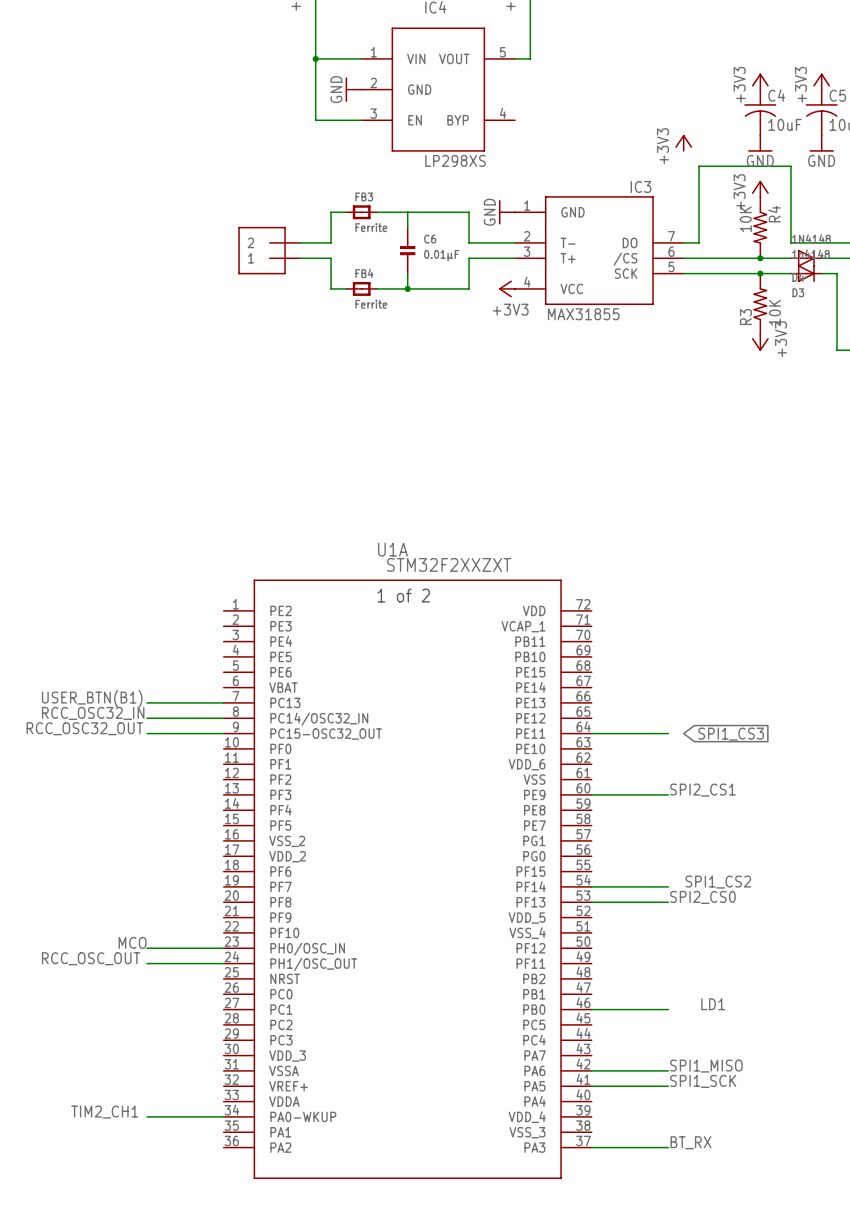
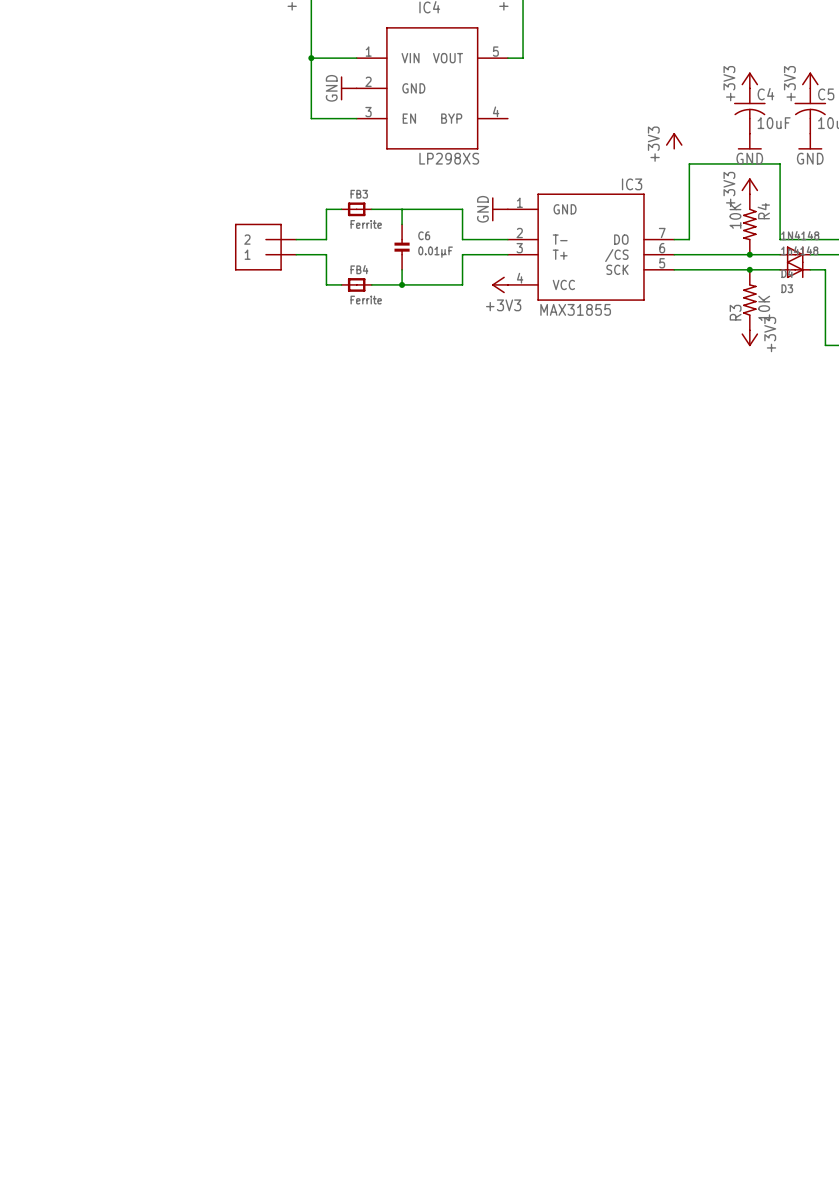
label: USER_BTN(B1) (92, 698) -> none
wire: (147, 702) (223, 702) -> none
label: RCC_OSC32_IN (93, 713) -> none
wire: (147, 718) (223, 718) -> none
label: RCC_OSC32_OUT (84, 728) -> none
wire: (147, 733) (223, 733) -> none
wire: (591, 733) (668, 733) -> none
global label: SPI1_CS3 (731, 734) -> none
label: SPI2_CS1 (702, 790) -> none
wire: (591, 794) (668, 794) -> none
U1A: STM32F2XXZXT (407, 879) -> none
label: SPI1_CS2 (718, 882) -> none
wire: (591, 886) (668, 886) -> none
label: SPI2_CS0 (702, 897) -> none
wire: (591, 902) (668, 902) -> none
label: MCO (132, 942) -> none
wire: (147, 948) (223, 948) -> none
label: RCC_OSC_OUT (91, 958) -> none
wire: (147, 963) (223, 963) -> none
label: LD1 (713, 1004) -> none
wire: (591, 1009) (668, 1009) -> none
label: SPI1_MISO (706, 1066) -> none
wire: (591, 1070) (668, 1070) -> none
label: SPI1_SCK (703, 1081) -> none
wire: (591, 1086) (668, 1086) -> none
label: TIM2_CH1 (104, 1112) -> none
wire: (147, 1116) (223, 1116) -> none
label: BT_RX (691, 1142) -> none
wire: (591, 1147) (668, 1147) -> none

